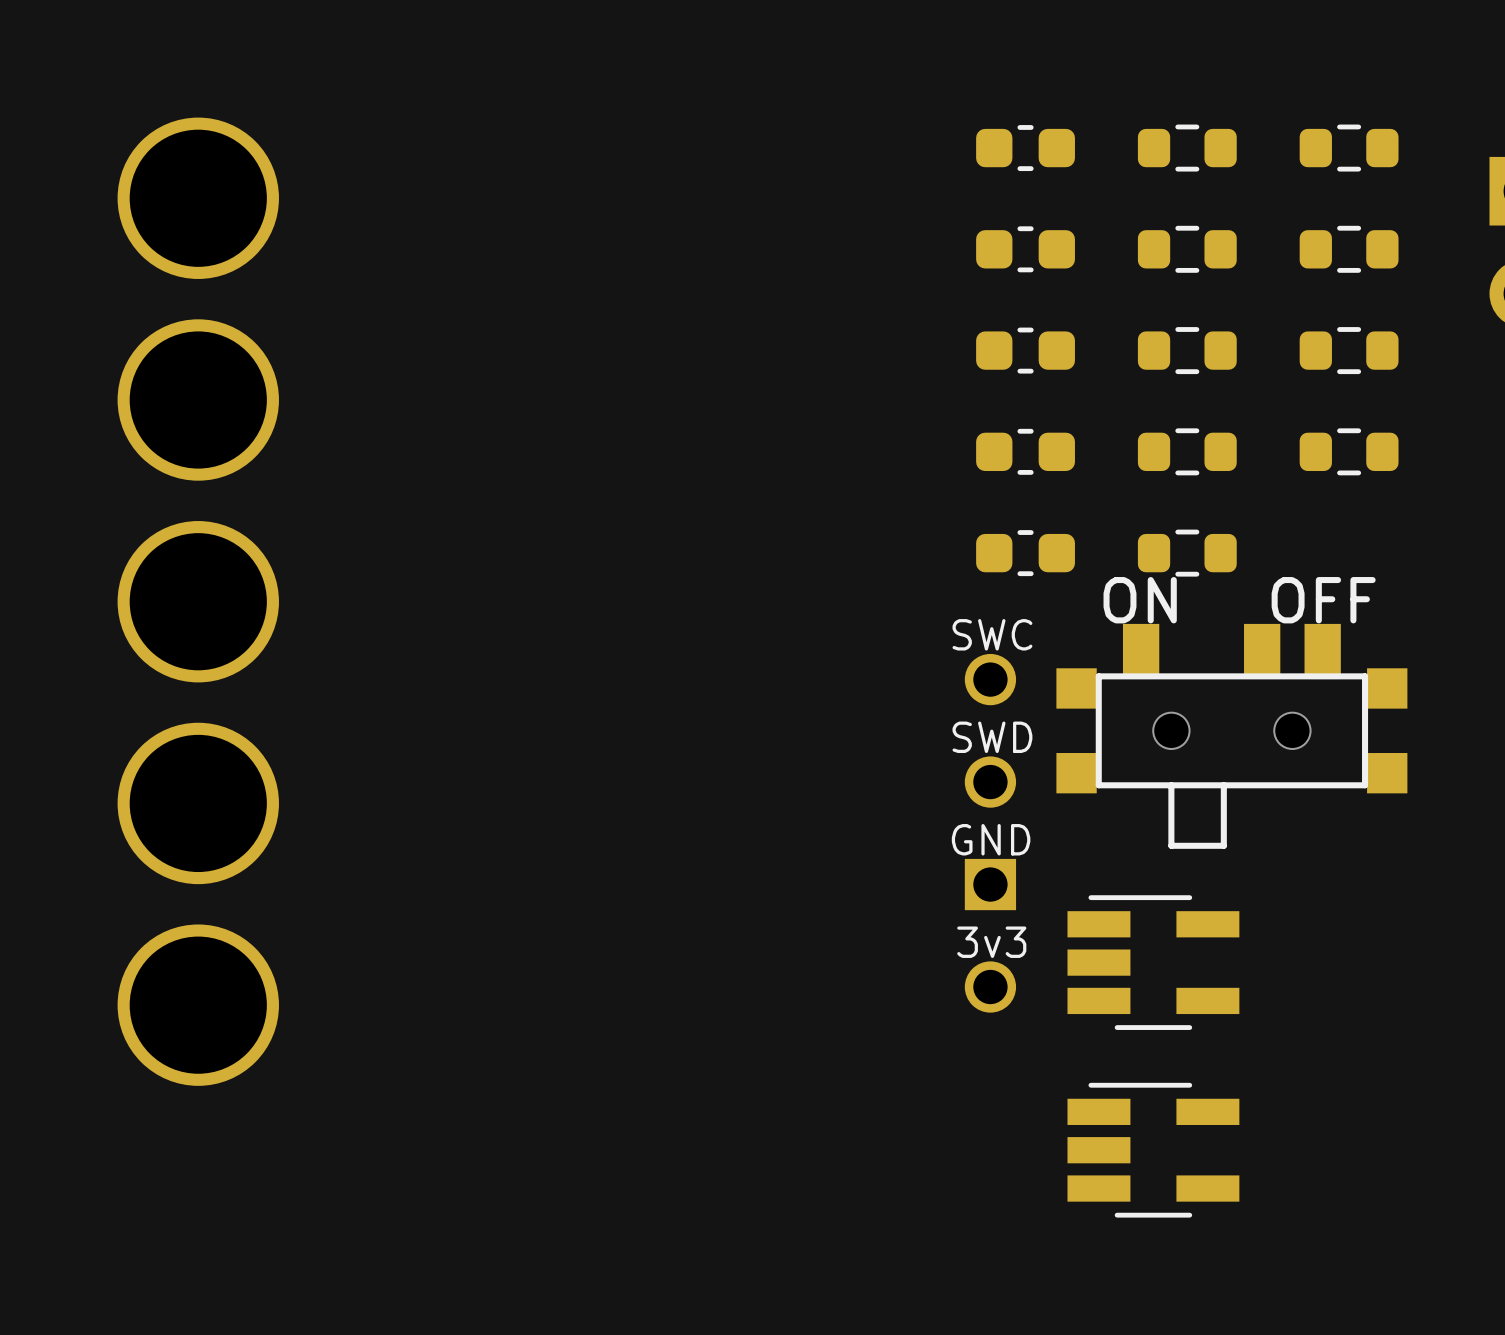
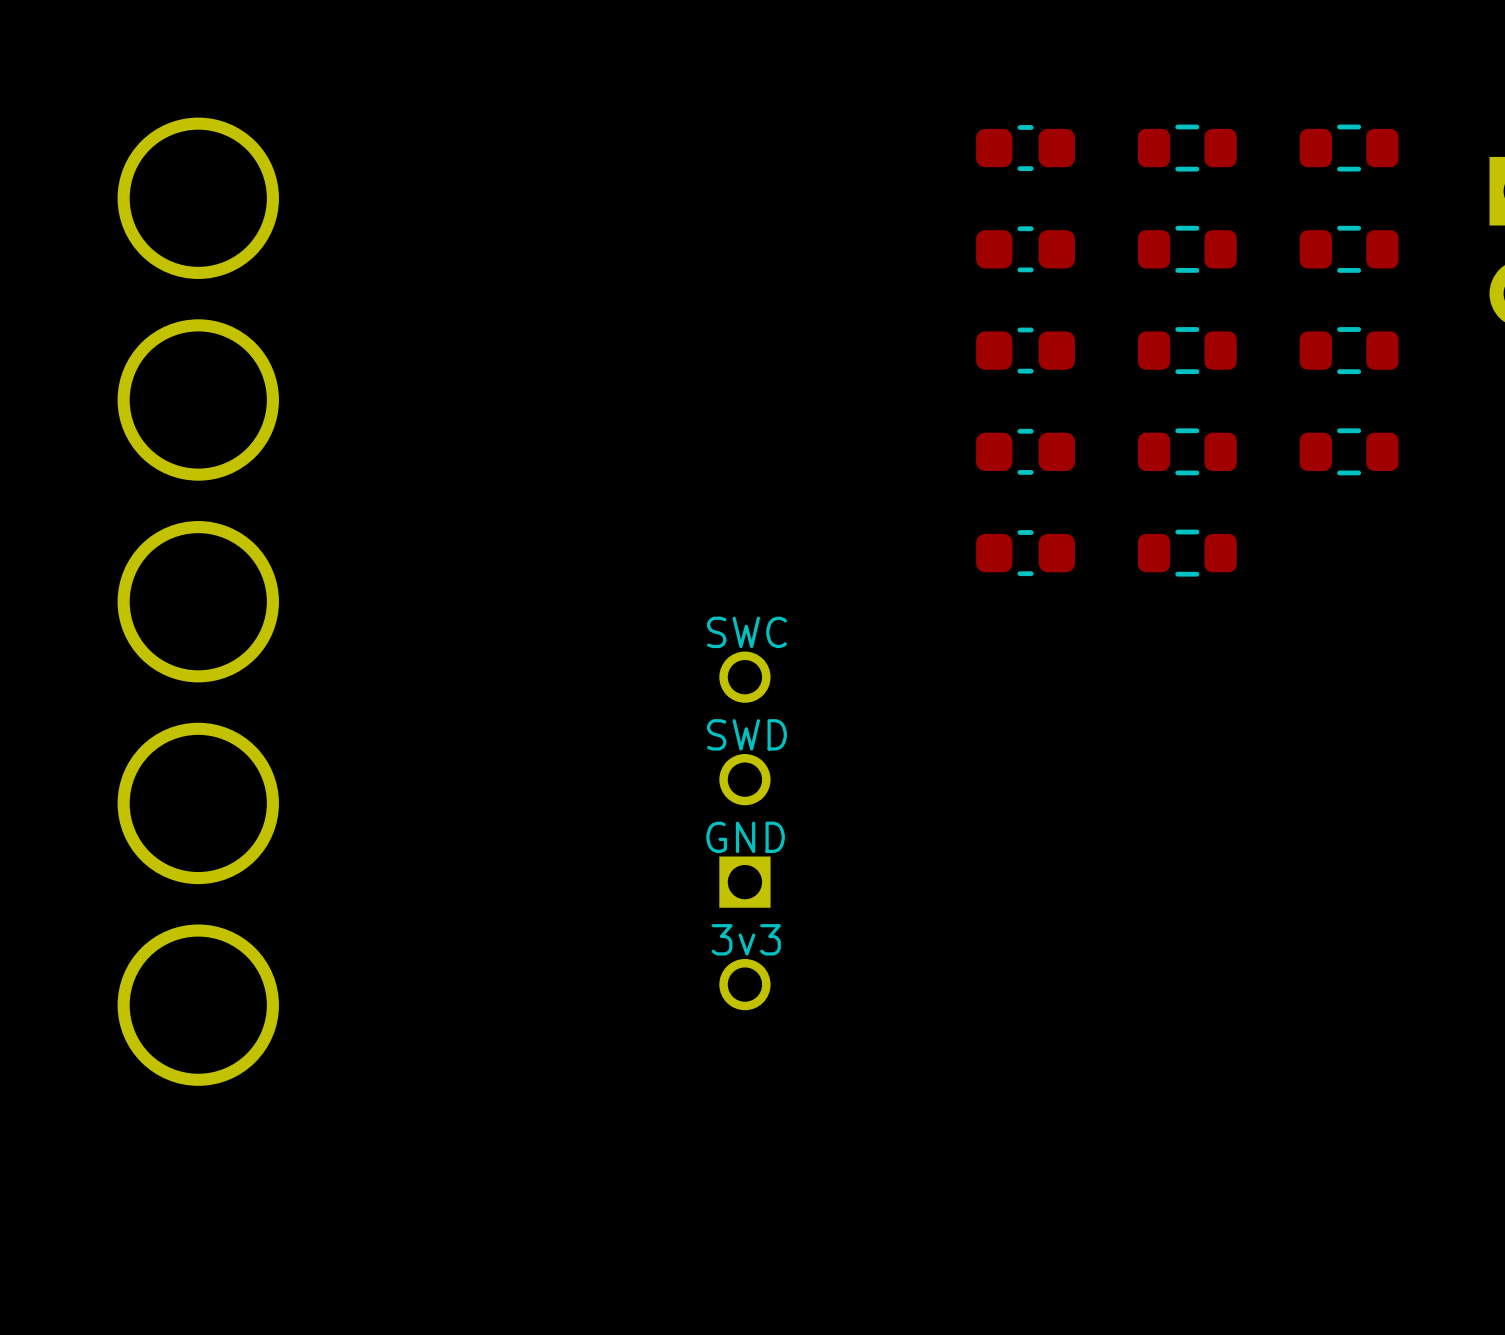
part: (1231, 736) -> none
part position: (990, 833) -> (744, 830)
part: (1153, 962) -> none
part: (1153, 1150) -> none

